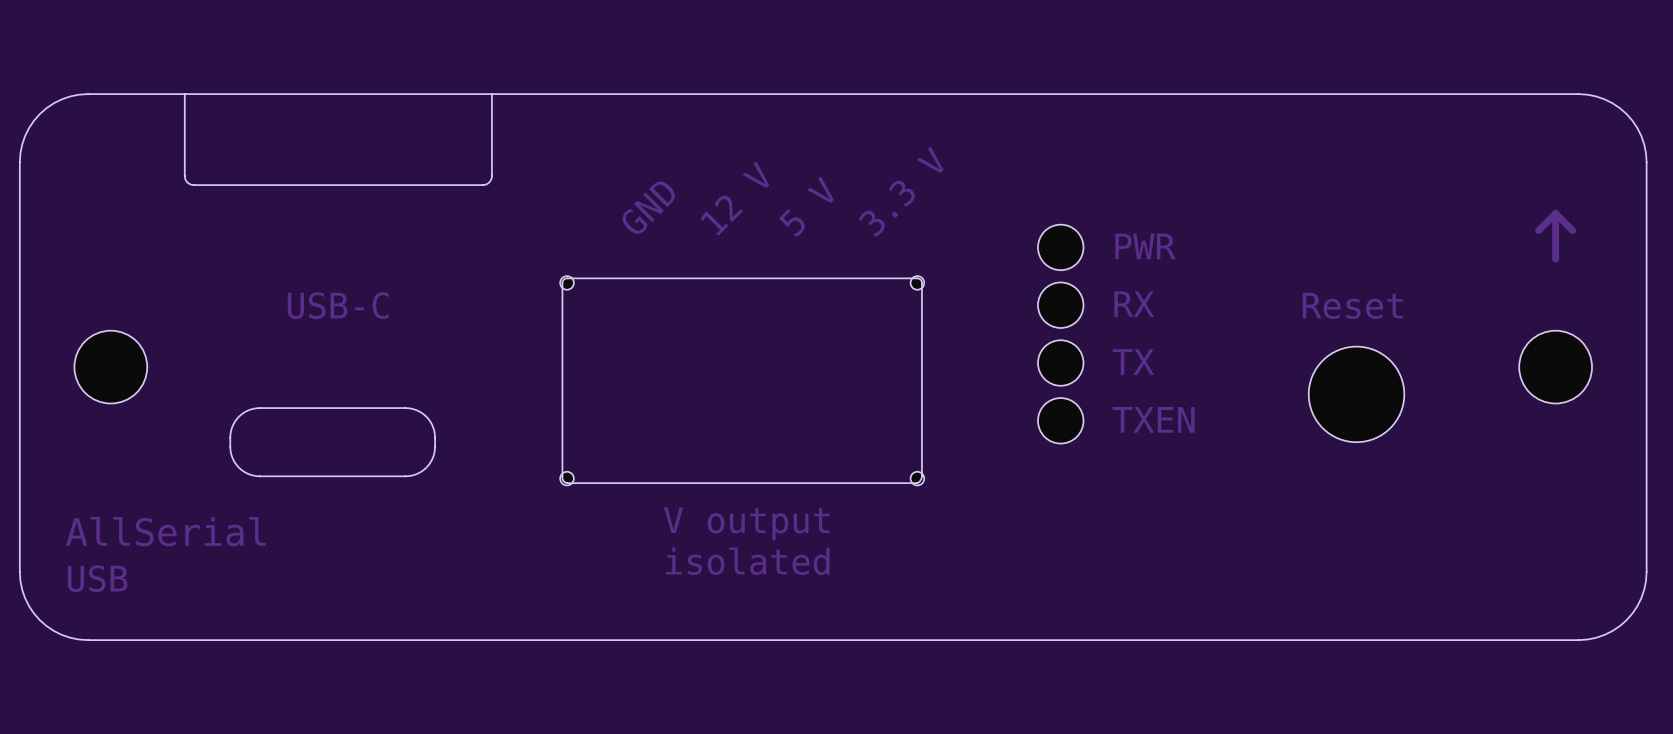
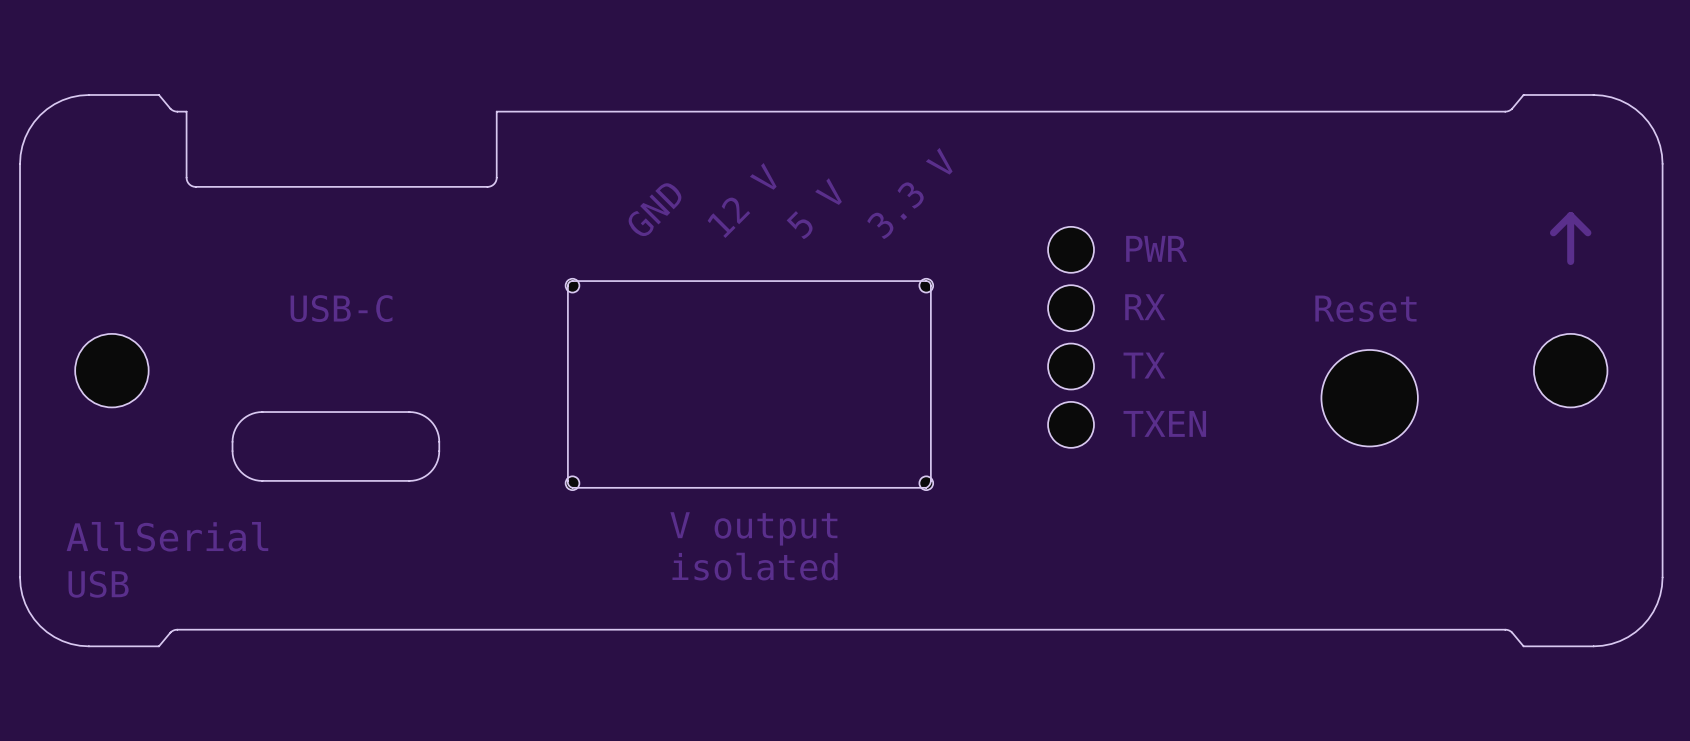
part footprint: [19, 93, 1648, 641] -> [19, 94, 1664, 647]
board edge: (184, 94) (184, 177) (188, 183) (193, 185) (485, 184) (491, 177) (491, 94) -> none

